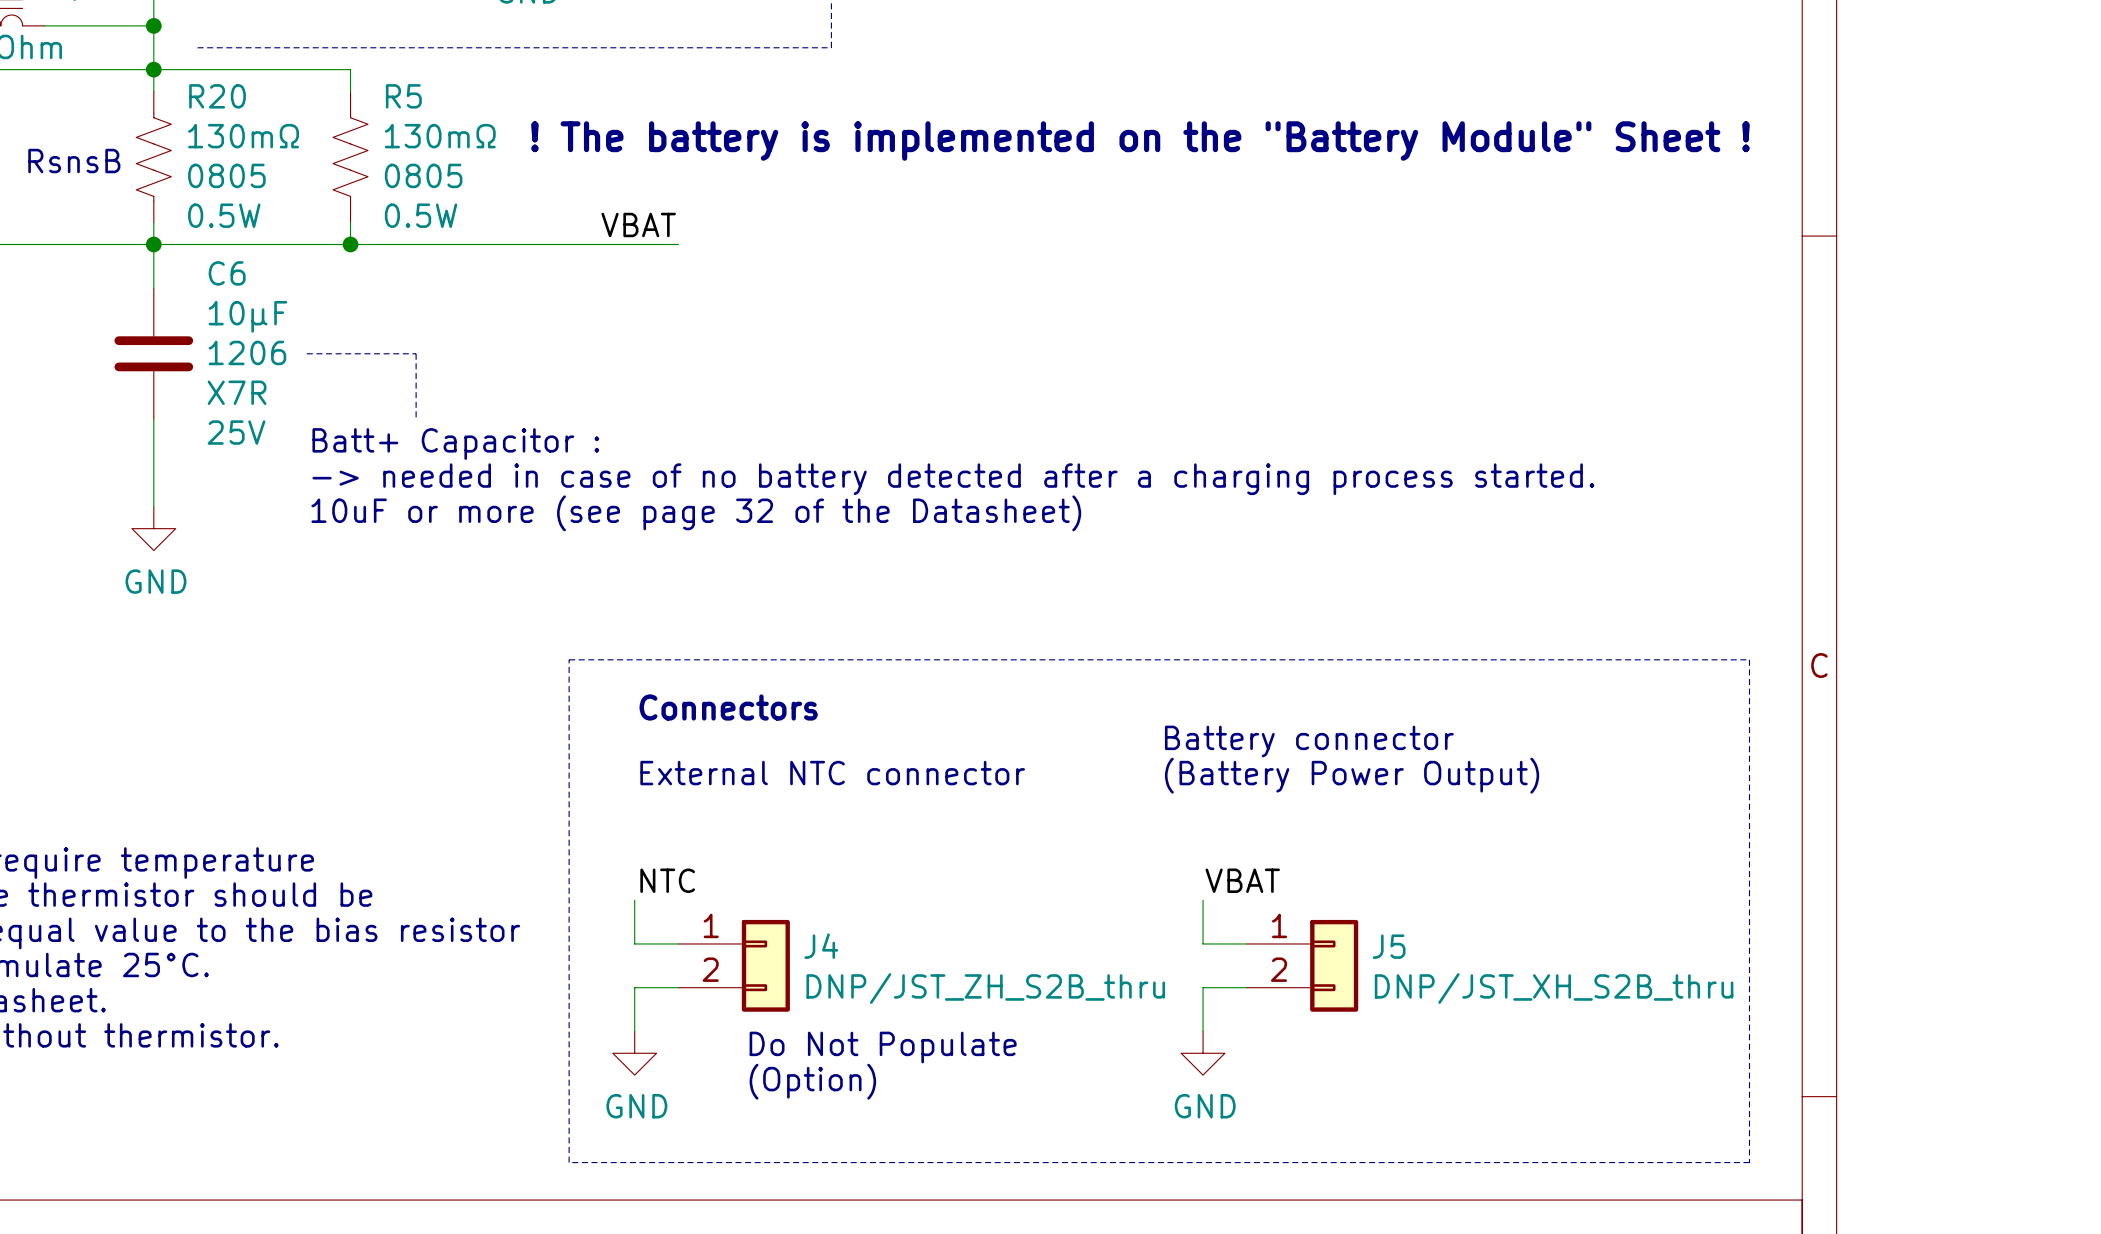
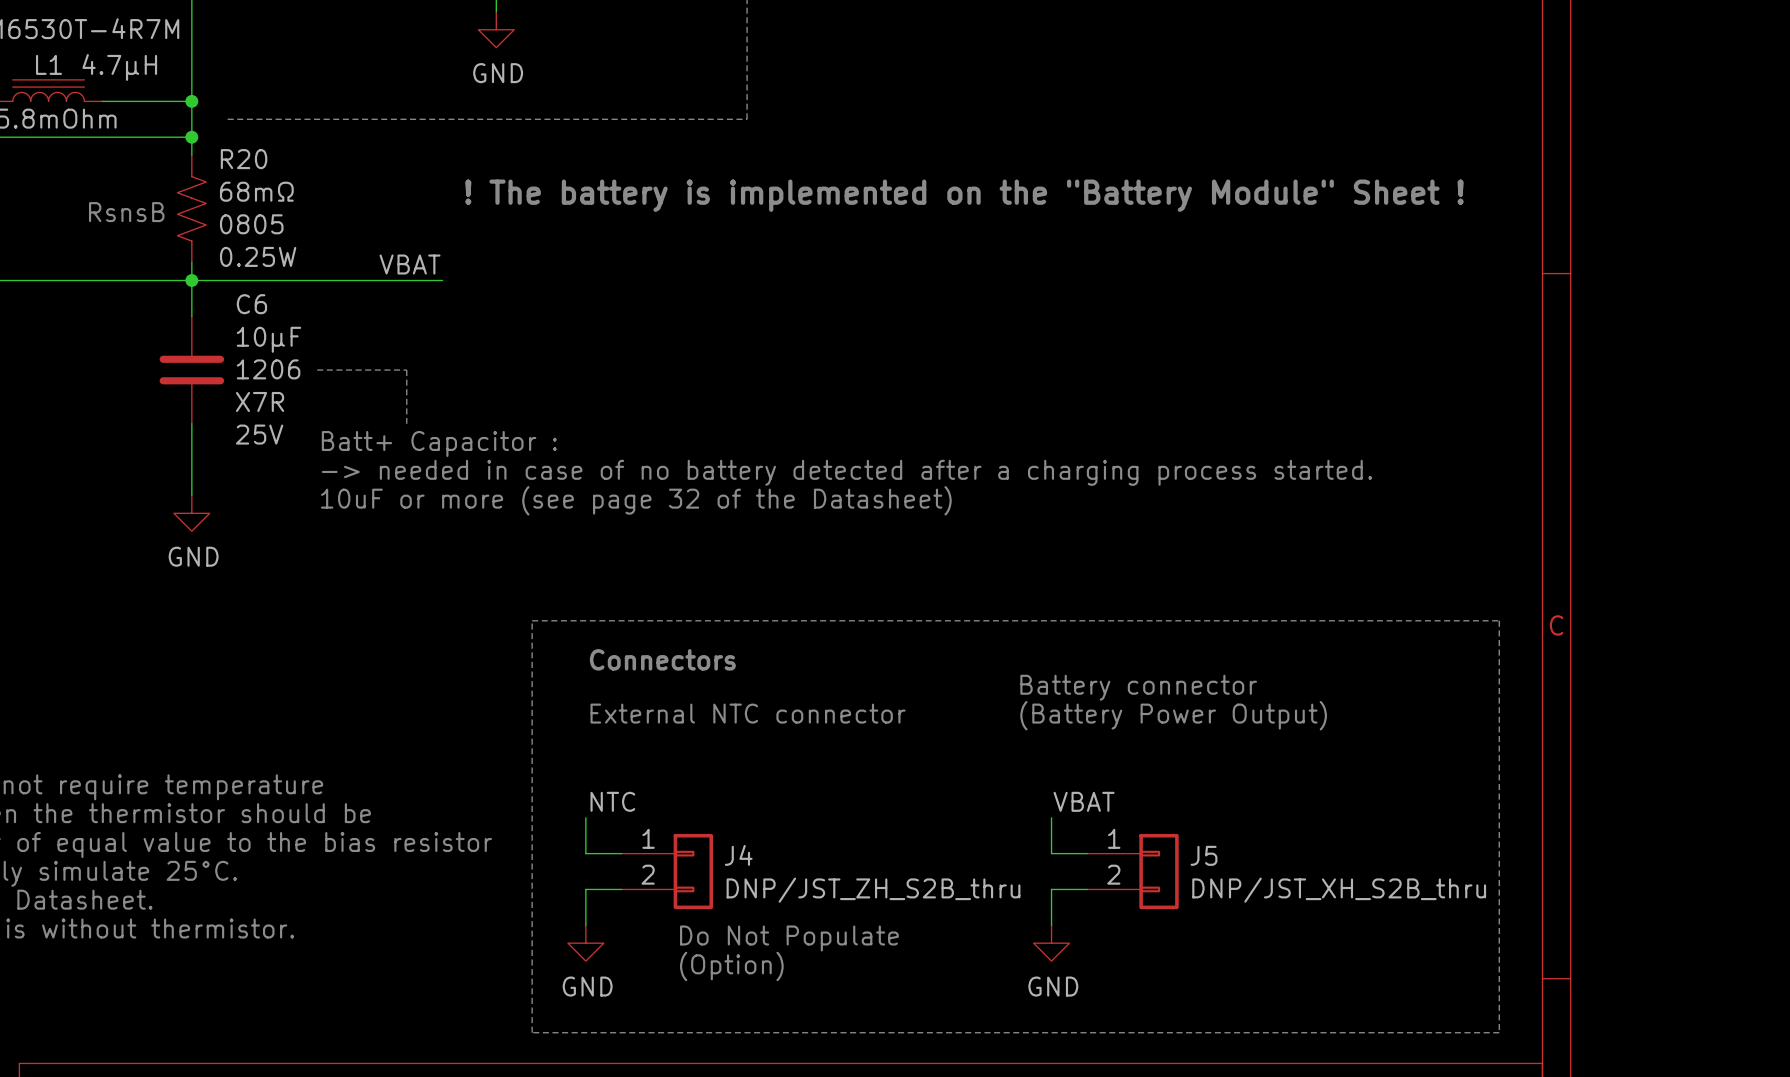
wire: (153, 69) (350, 69) (350, 91) -> none
R20 text: 130mΩ (243, 136) -> 68mΩ (256, 191)
text position: ! The battery is implemented on the "Battery Module" Sheet ! (1140, 141) -> ! The battery is implemented on the "Battery Module" Sheet ! (964, 195)
R5: (350, 157) -> none
R20 text: 0.5W (224, 215) -> 0.25W (258, 256)
wire: (350, 222) (350, 244) -> none
label position: VBAT (638, 224) -> VBAT (410, 264)
junction: (350, 244) -> none
wire: (459, 244) (678, 244) -> none

